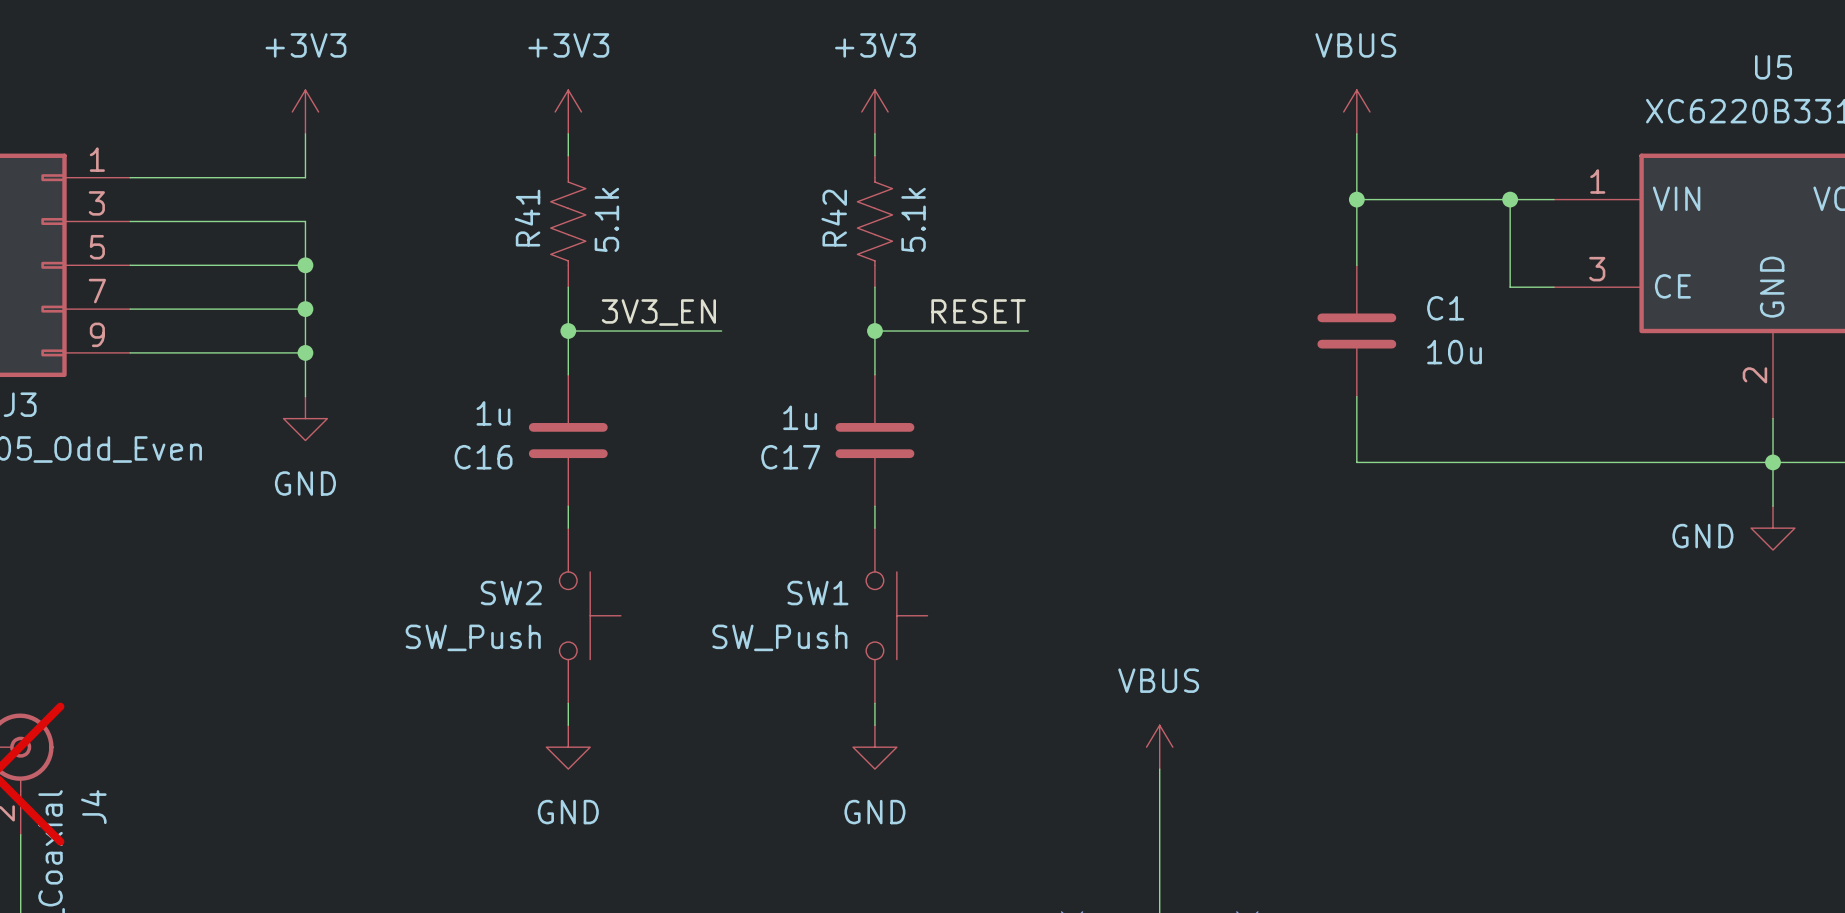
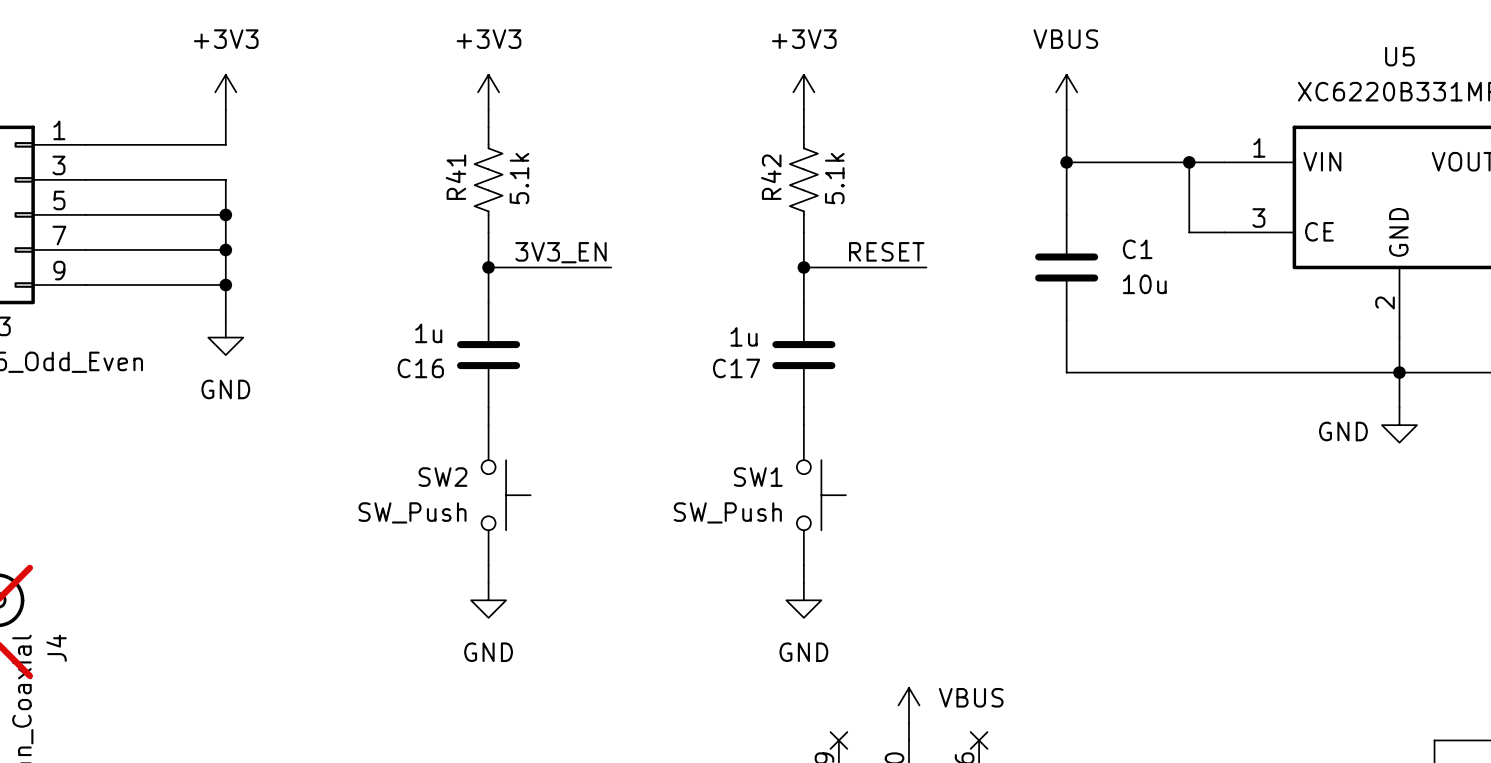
power symbol position: +3V3 (568, 111) -> +3V3 (488, 92)
power symbol: +3V3 (874, 111) -> none
power symbol: none -> +3V3 (803, 92)
wire: (568, 133) (568, 155) -> (488, 109) (488, 127)
wire: (874, 133) (874, 155) -> (803, 109) (803, 127)
R41 position: (568, 221) -> (488, 179)
R42 position: (874, 221) -> (803, 179)
wire: (568, 287) (568, 374) -> (488, 232) (488, 302)
wire: (874, 287) (874, 374) -> (803, 232) (803, 302)
label position: RESET (978, 311) -> RESET (886, 251)
label position: 3V3_EN (658, 312) -> 3V3_EN (561, 252)
wire: (568, 331) (634, 331) -> (558, 267) (611, 267)
junction position: (568, 331) -> (488, 267)
wire: (874, 331) (1028, 331) -> (926, 267) (803, 267)
junction: (874, 331) -> none
junction: none -> (803, 267)
C16 position: (568, 440) -> (488, 355)
C17 position: (874, 440) -> (803, 355)
wire: (568, 506) (568, 528) -> (488, 407) (488, 425)
wire: (874, 506) (874, 528) -> (803, 407) (803, 425)
SW2 position: (590, 615) -> (506, 495)
SW1 position: (896, 615) -> (821, 495)
power symbol text position: VBUS (1158, 680) -> VBUS (971, 697)
wire: (568, 703) (568, 725) -> (488, 565) (488, 582)
wire: (874, 703) (874, 725) -> (803, 565) (803, 582)
power symbol position: GND (568, 747) -> GND (488, 600)
power symbol: GND (874, 747) -> none
power symbol: none -> GND (803, 600)
power symbol position: VBUS (1159, 747) -> VBUS (908, 705)
wire: (1159, 769) (1159, 900) -> none

